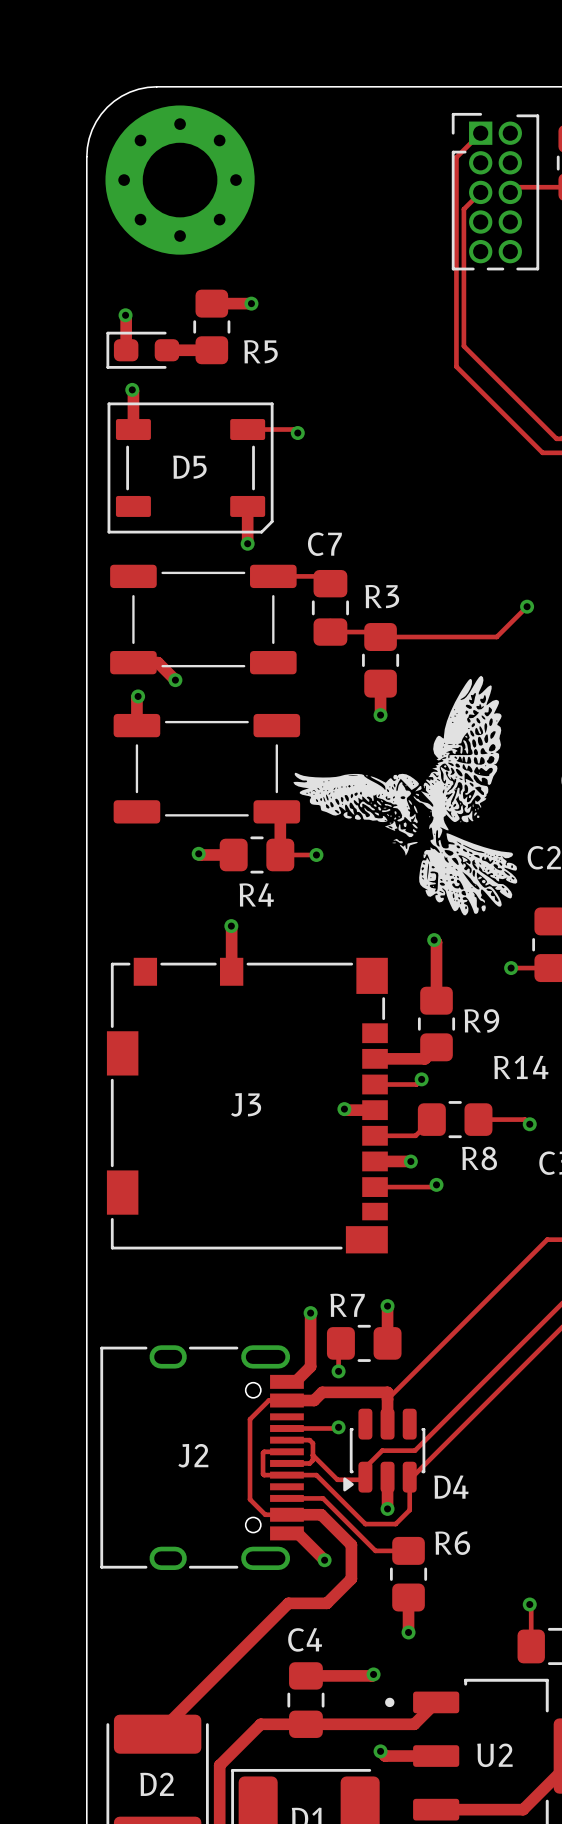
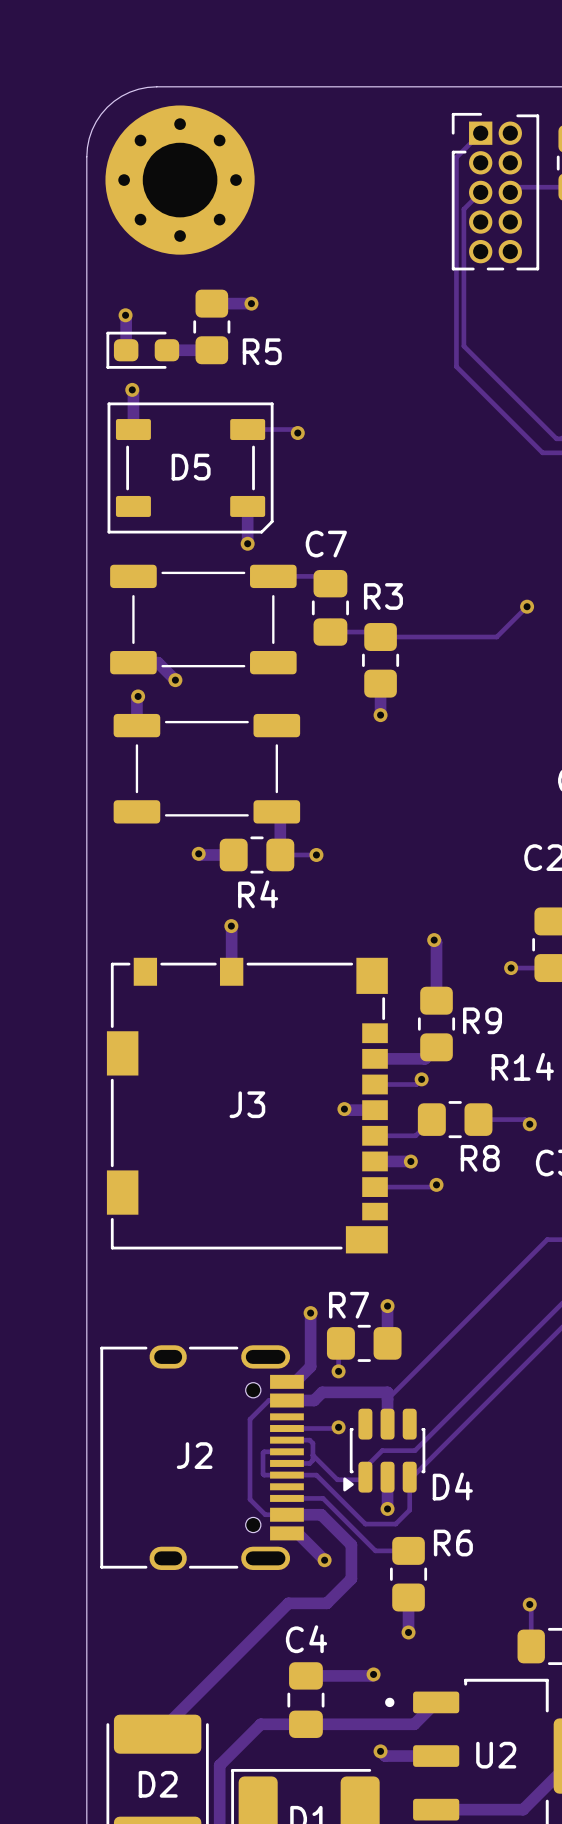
drawing: [293, 675, 518, 916] -> none

